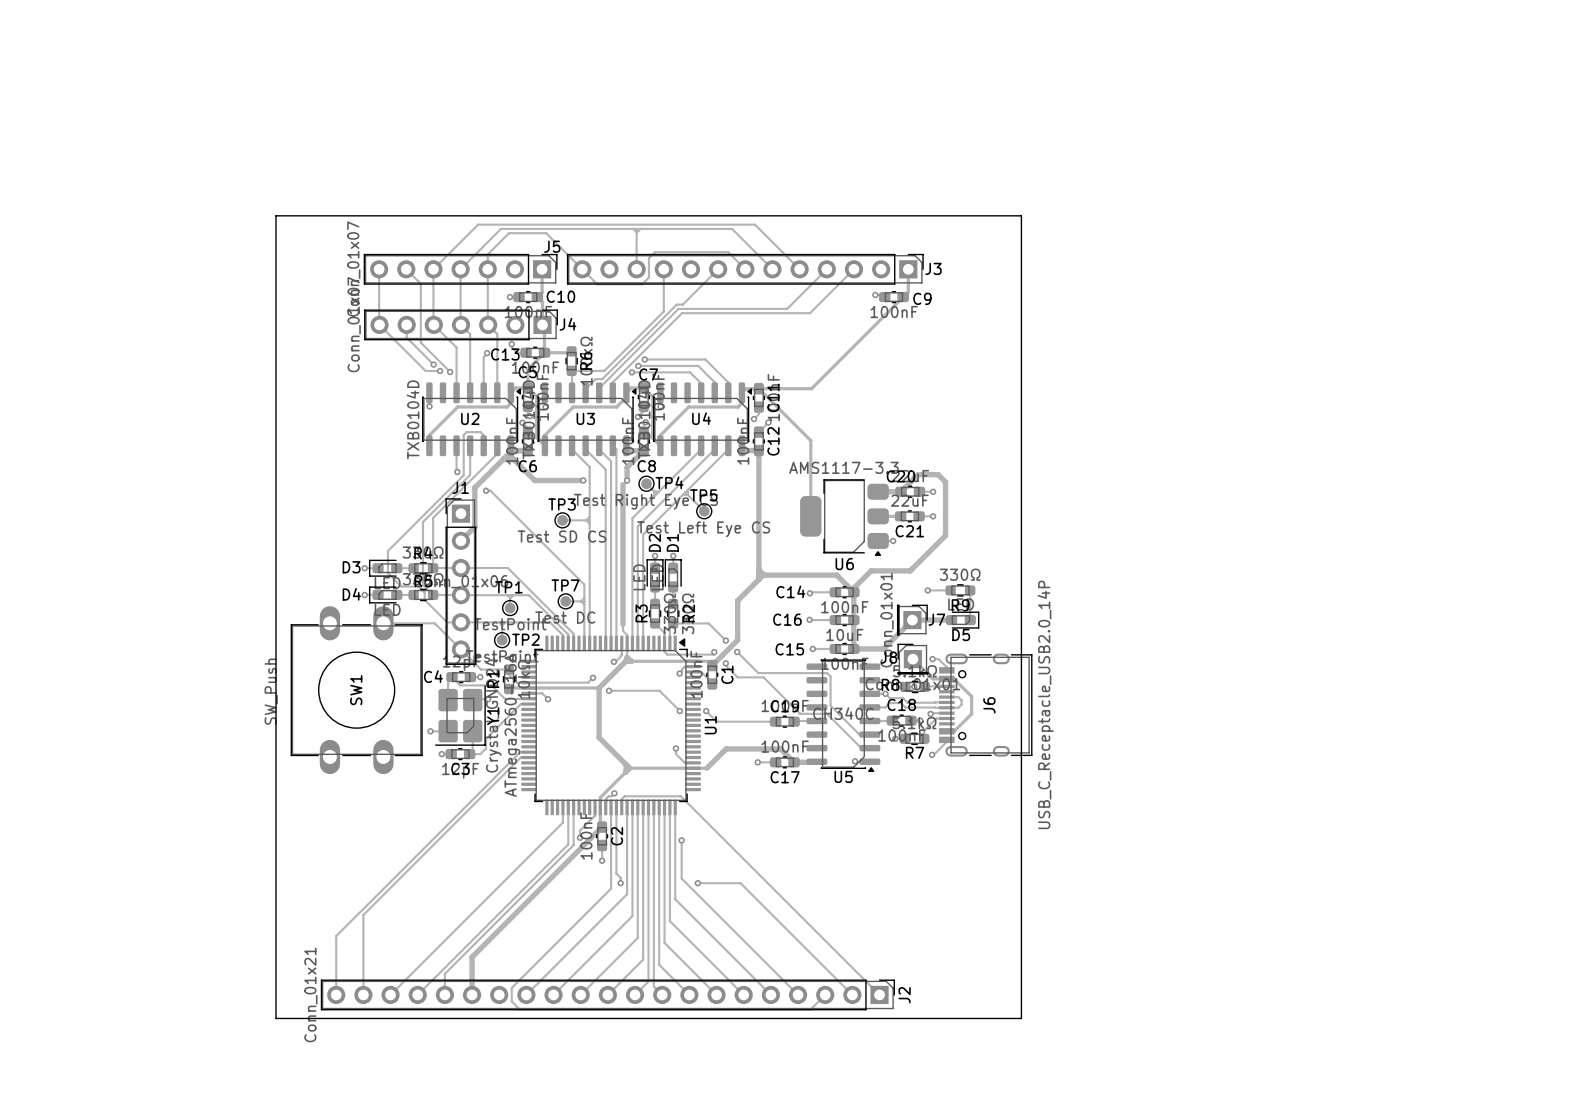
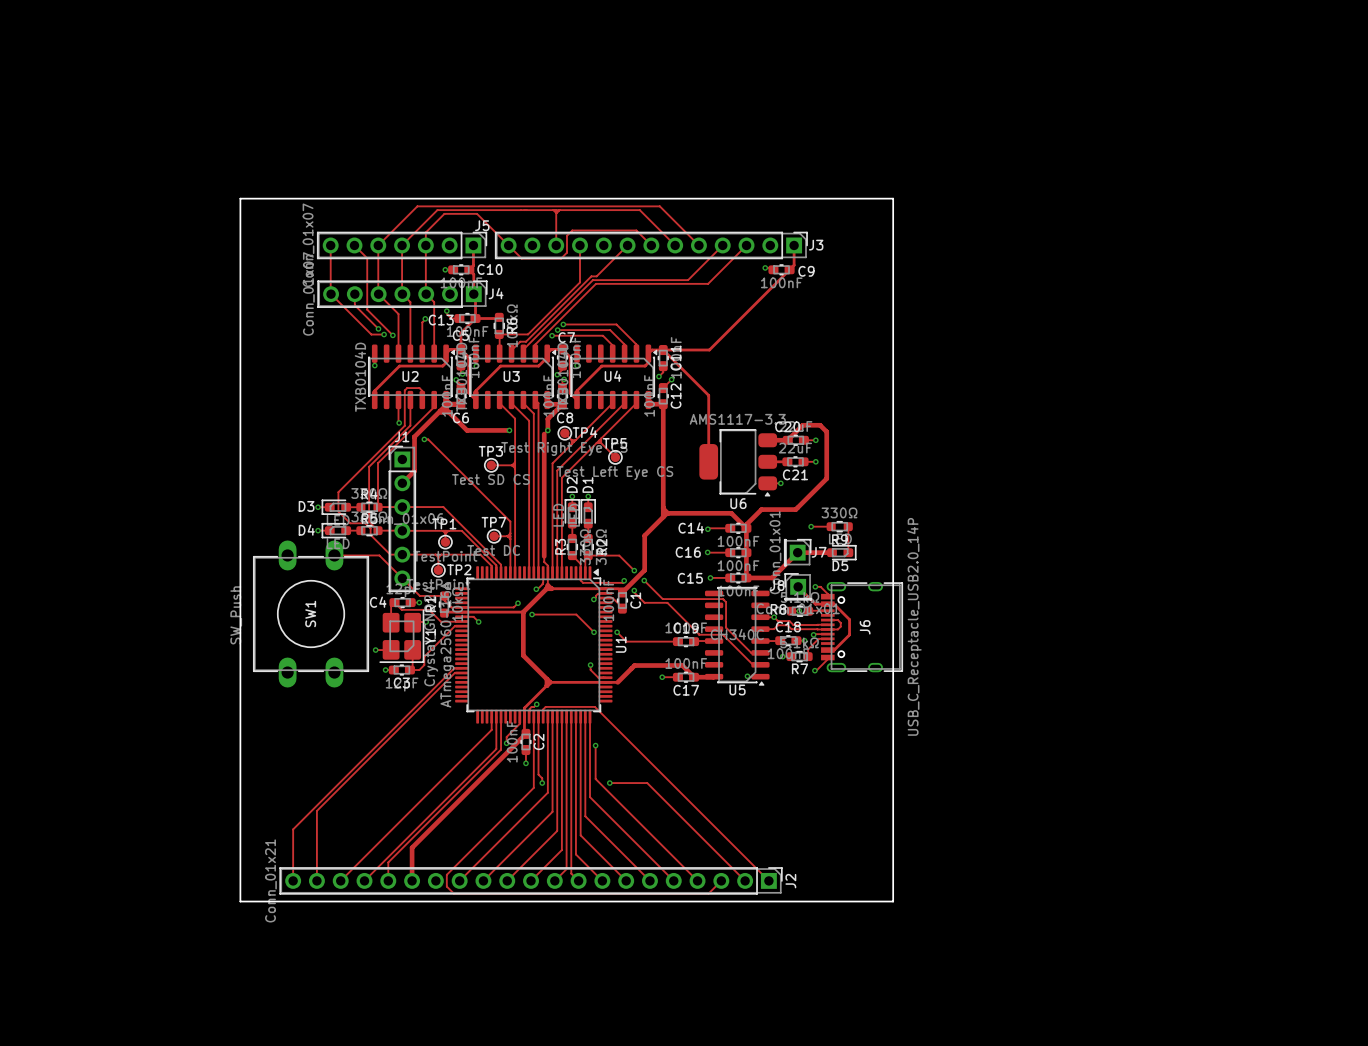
C16 value: 10uF (844, 634) -> 100nF (738, 565)

